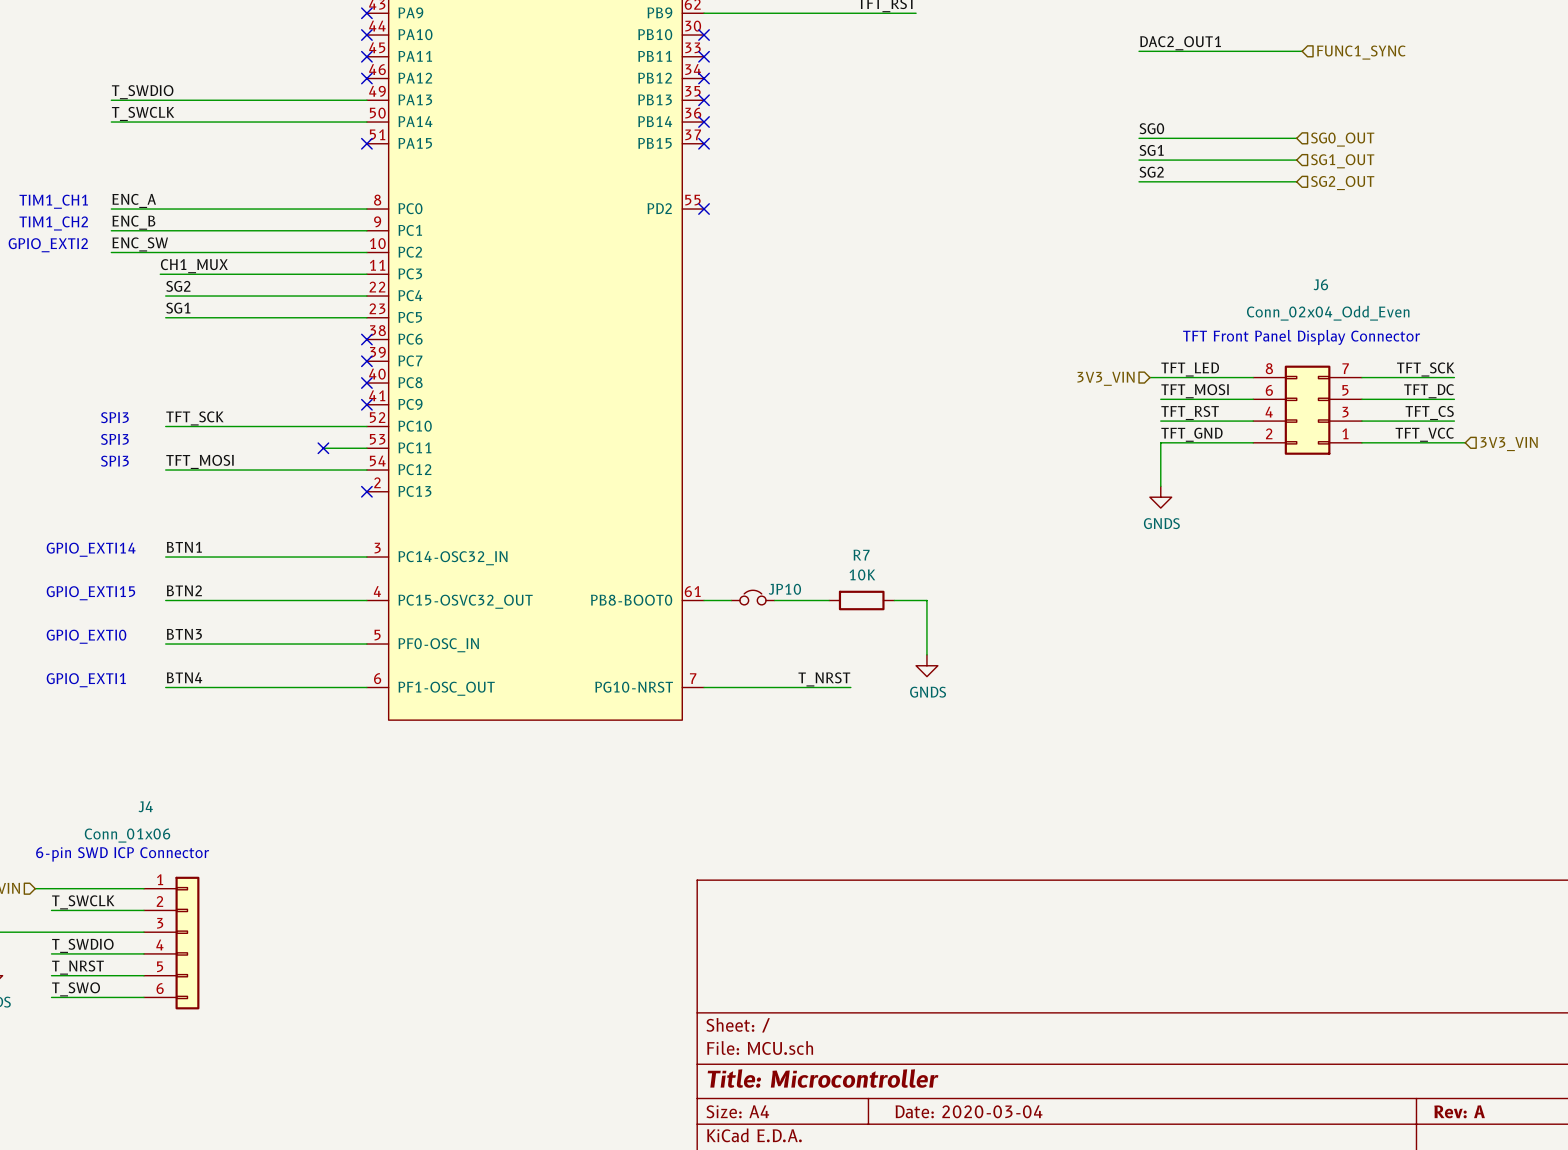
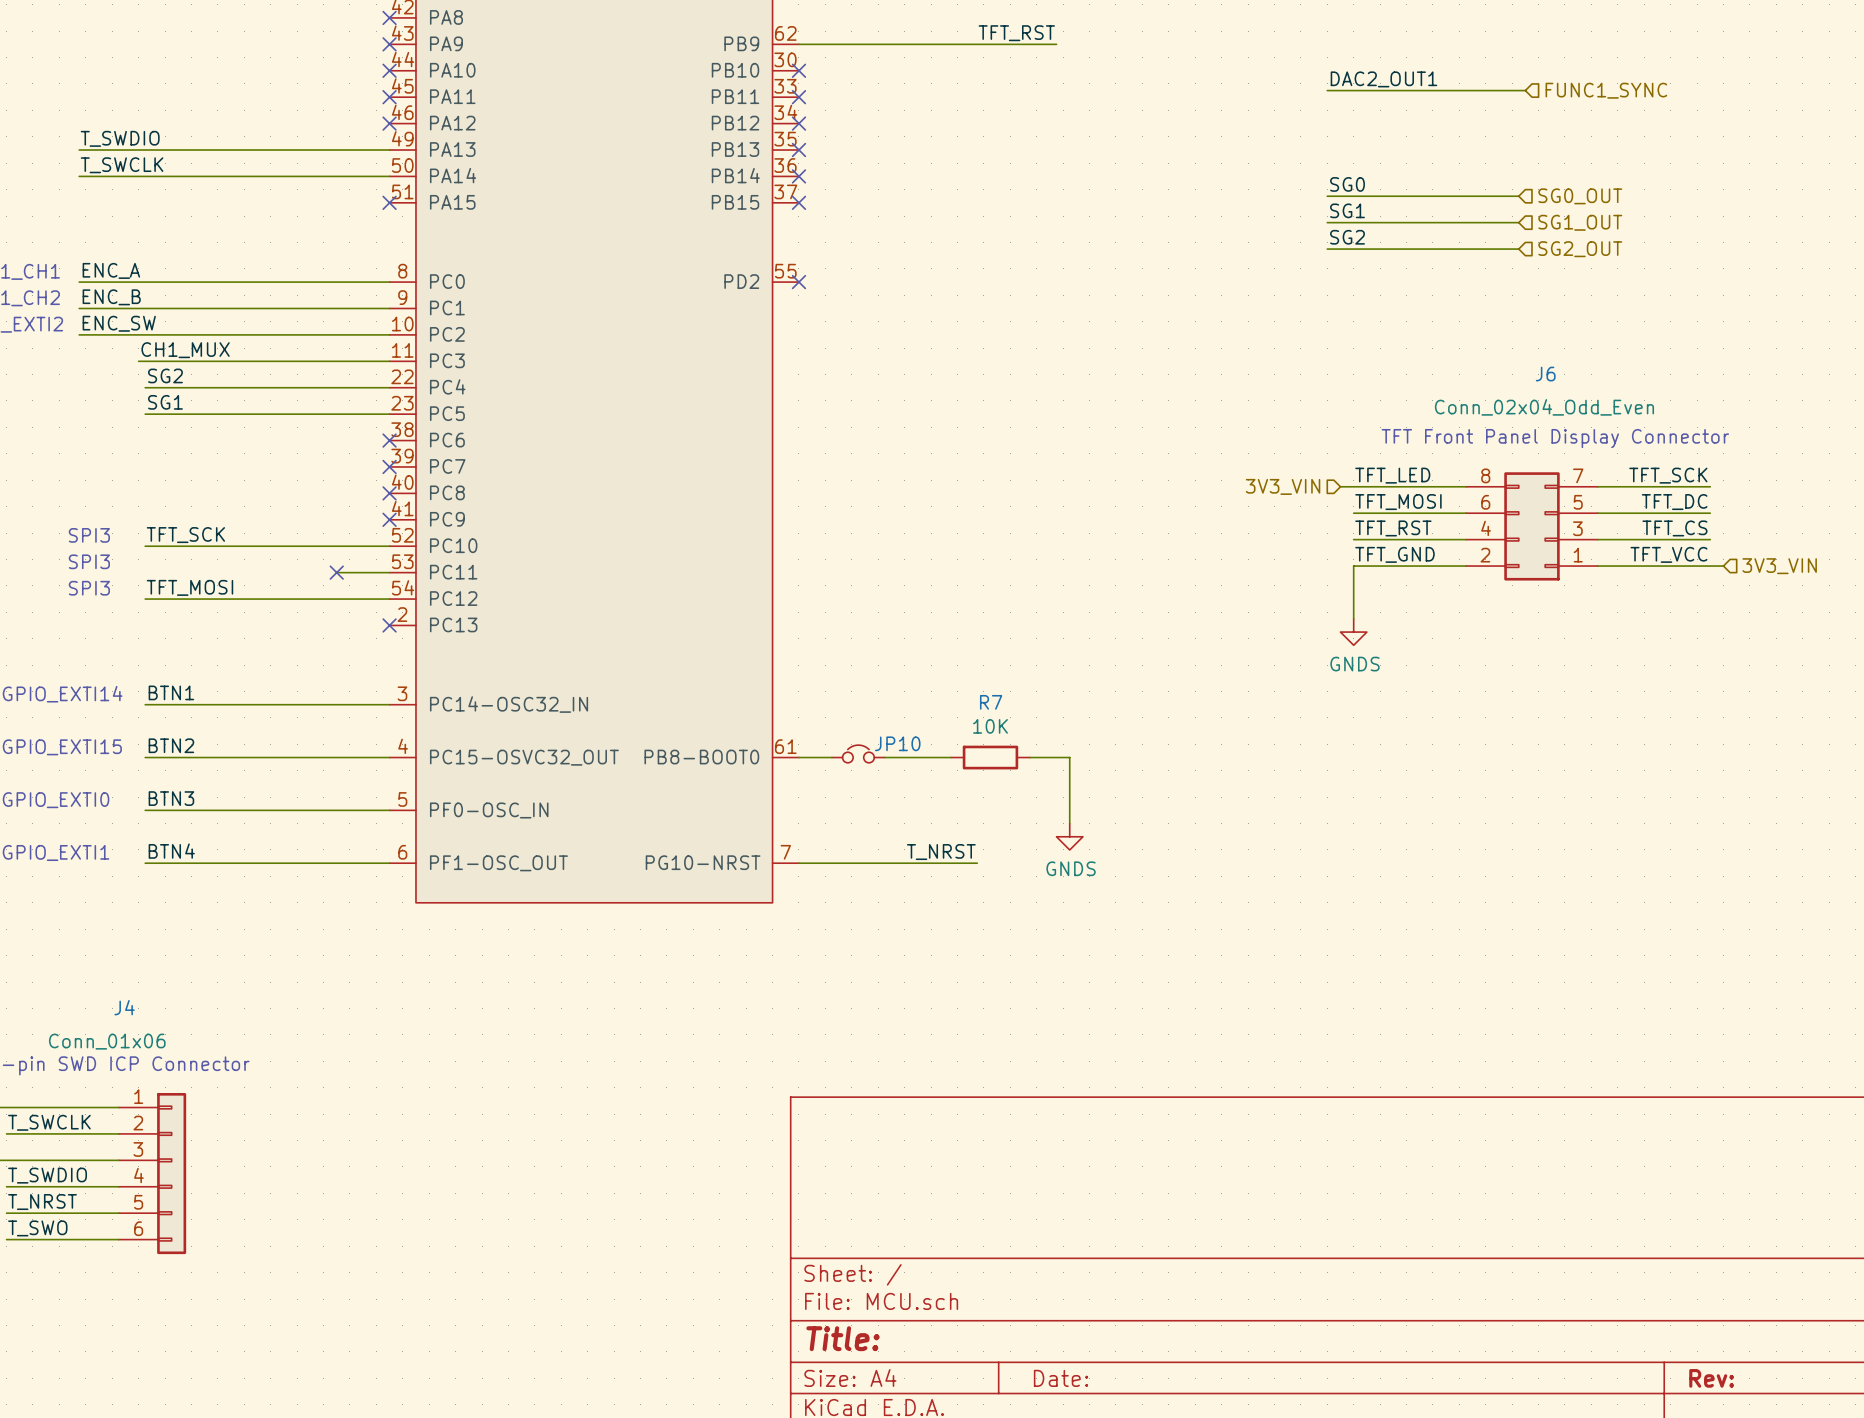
title block: Title: Microcontroller (823, 1078) -> Title: (843, 1338)
title block: Date: 2020-03-04 (969, 1111) -> Date: (1061, 1378)
title block: Rev: A (1459, 1111) -> Rev: (1711, 1378)

